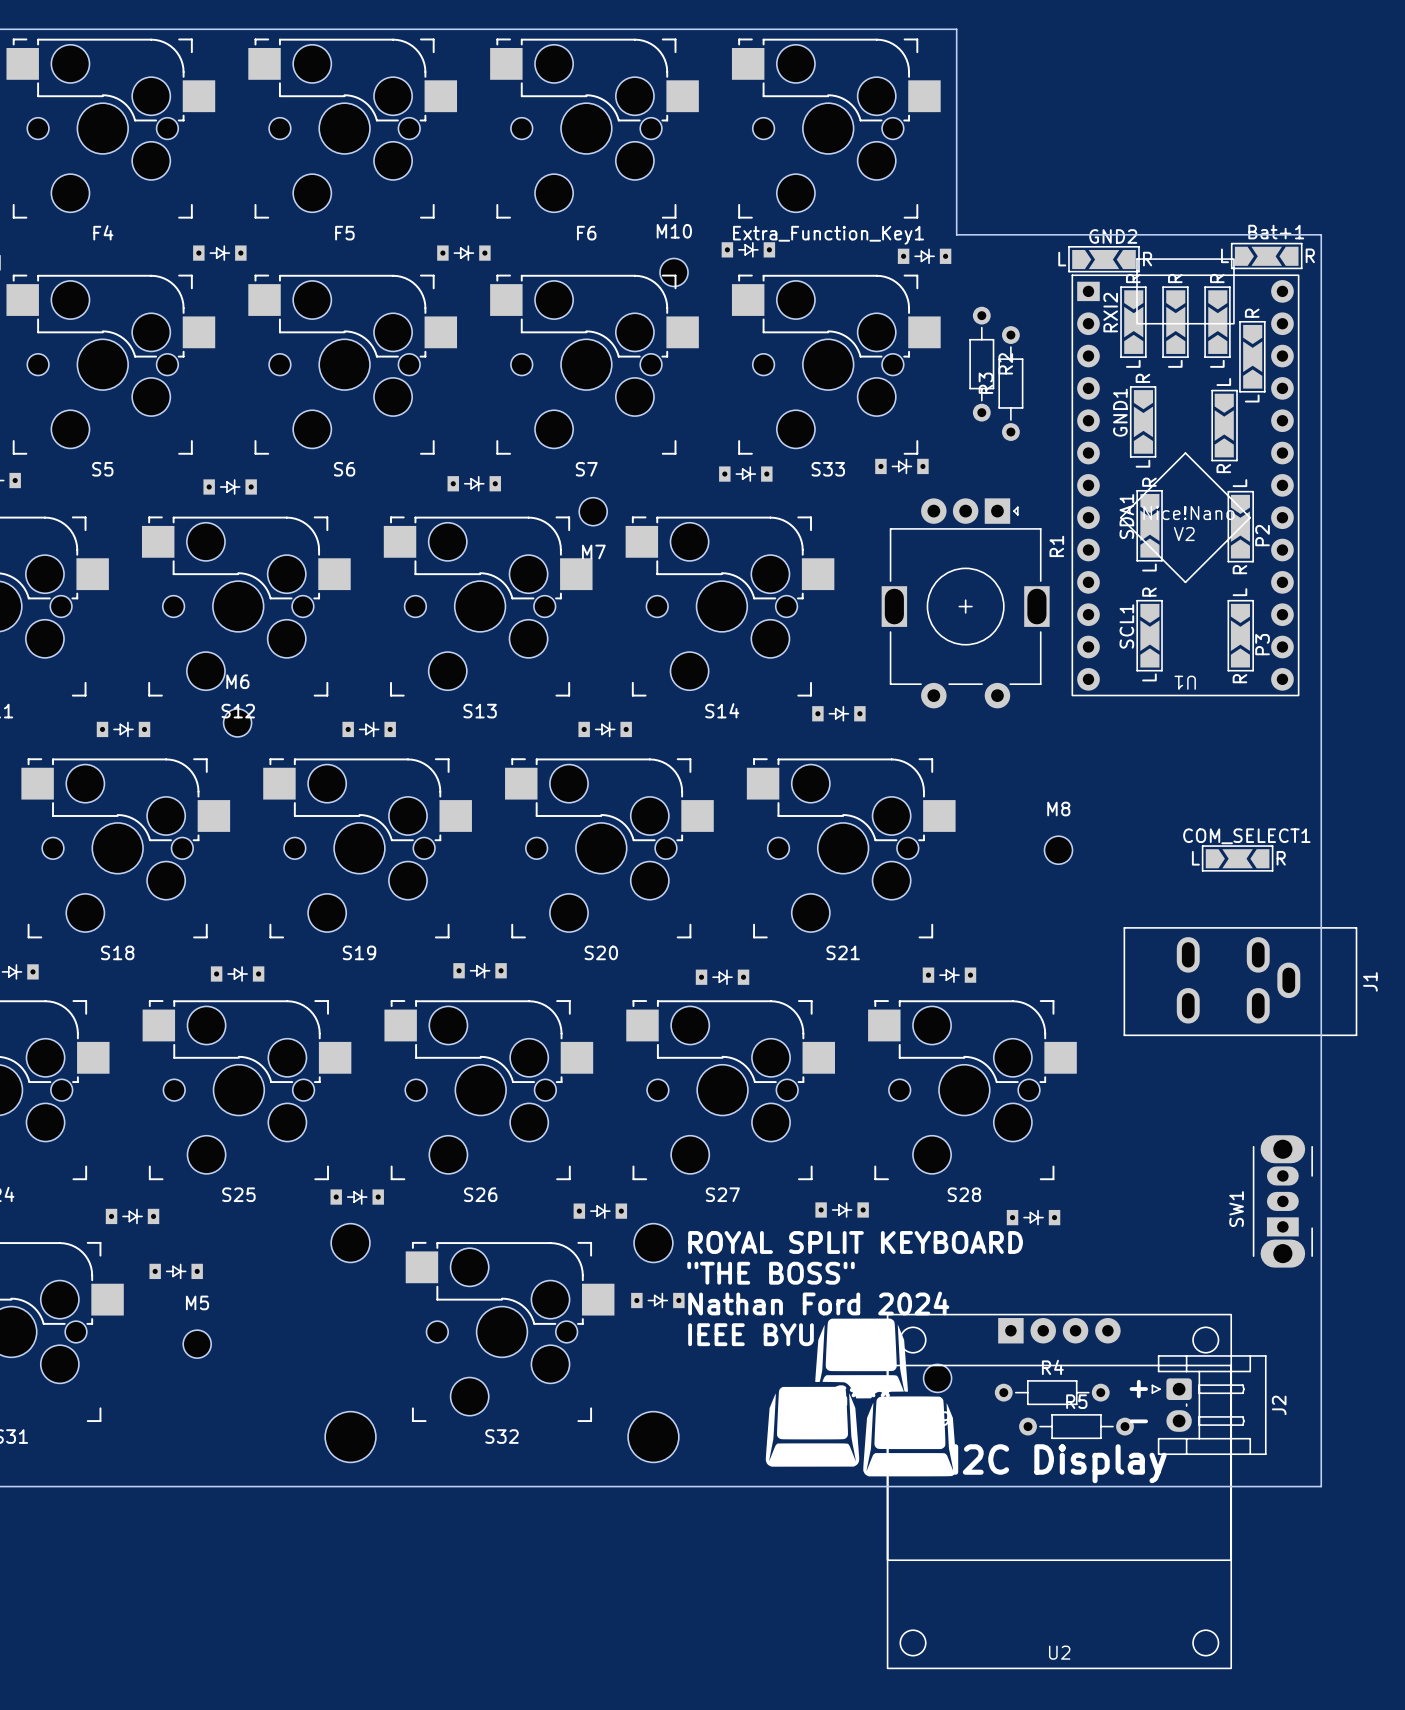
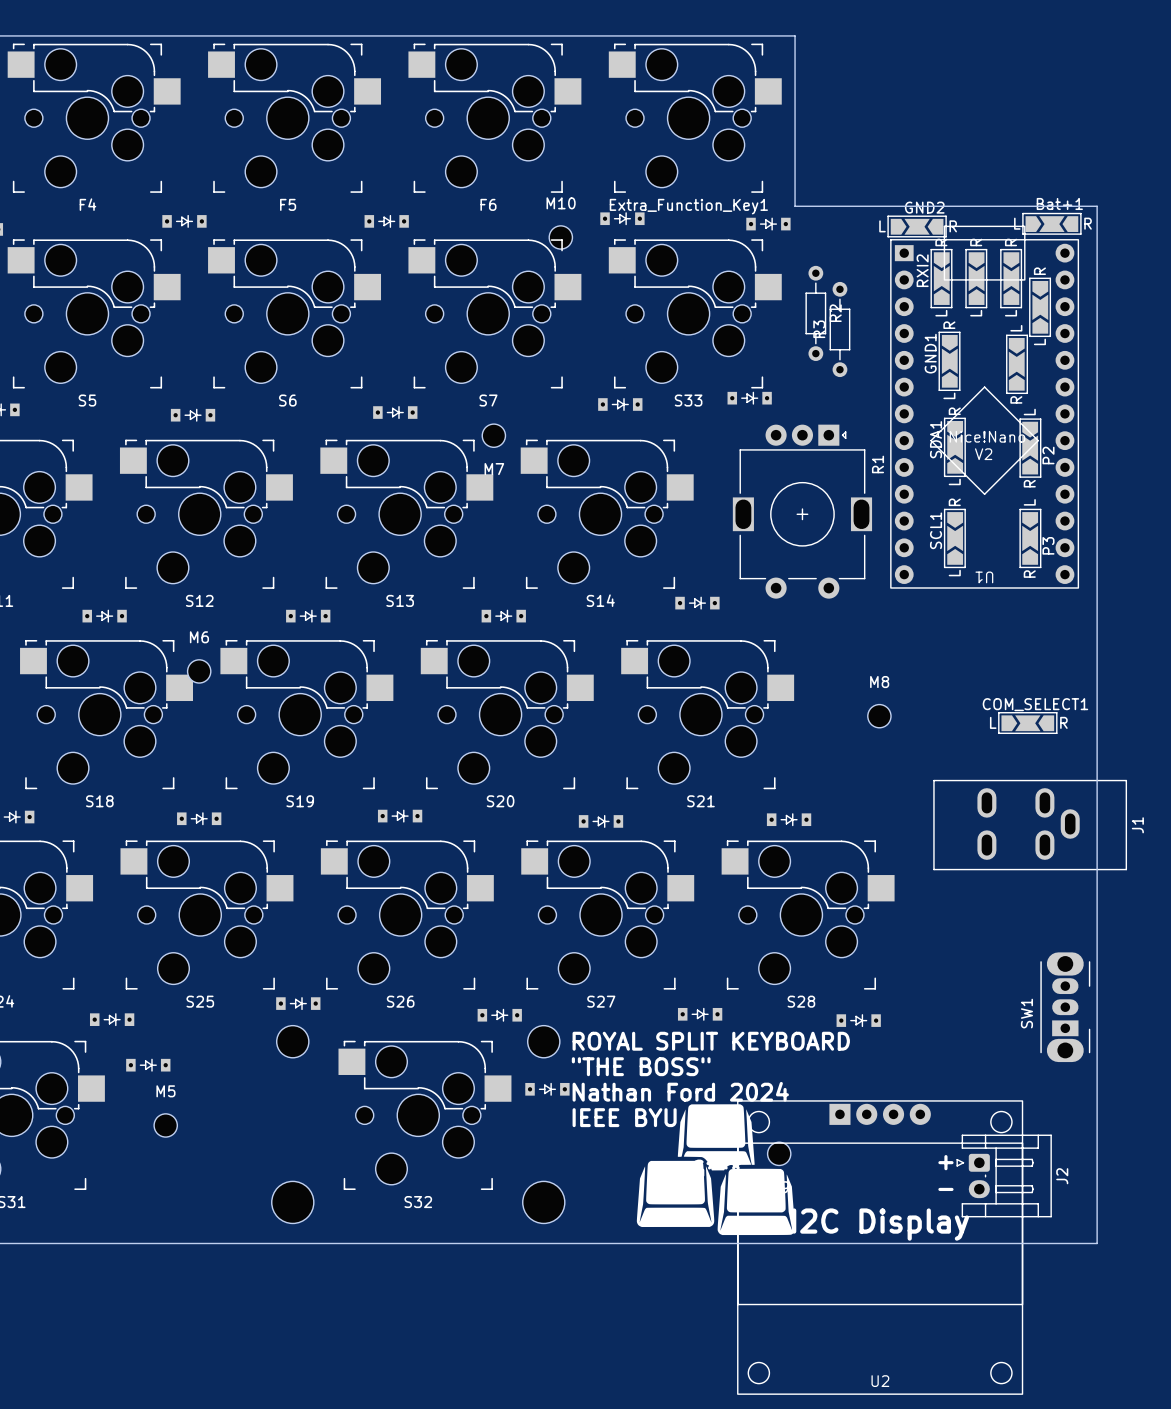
M6 position: (237, 722) -> (199, 671)
R4: (1052, 1392) -> none
R5: (1076, 1426) -> none

